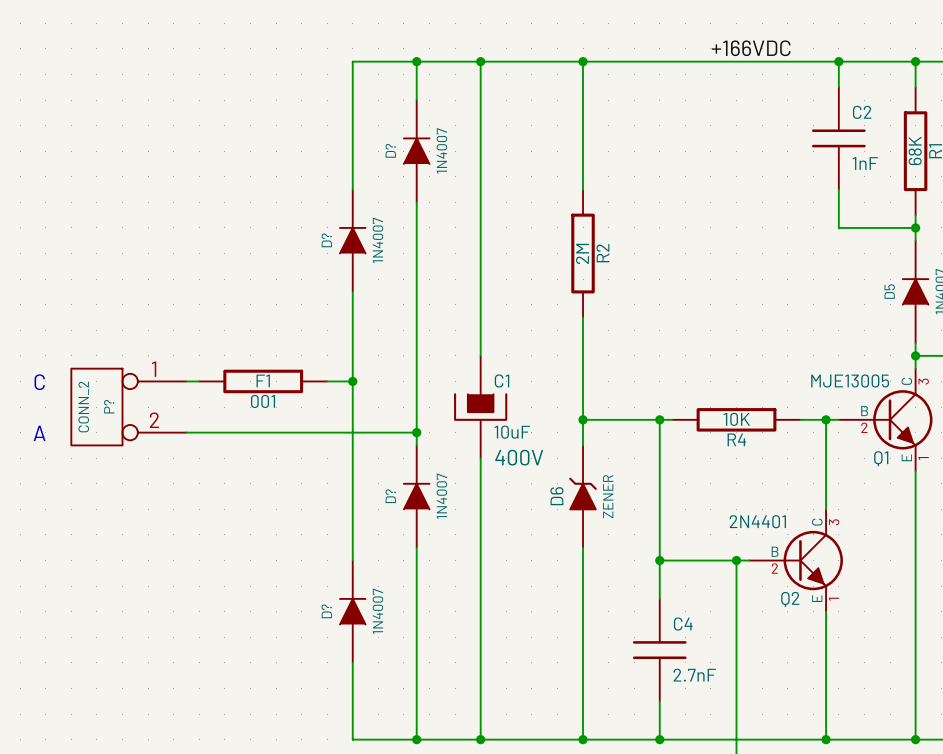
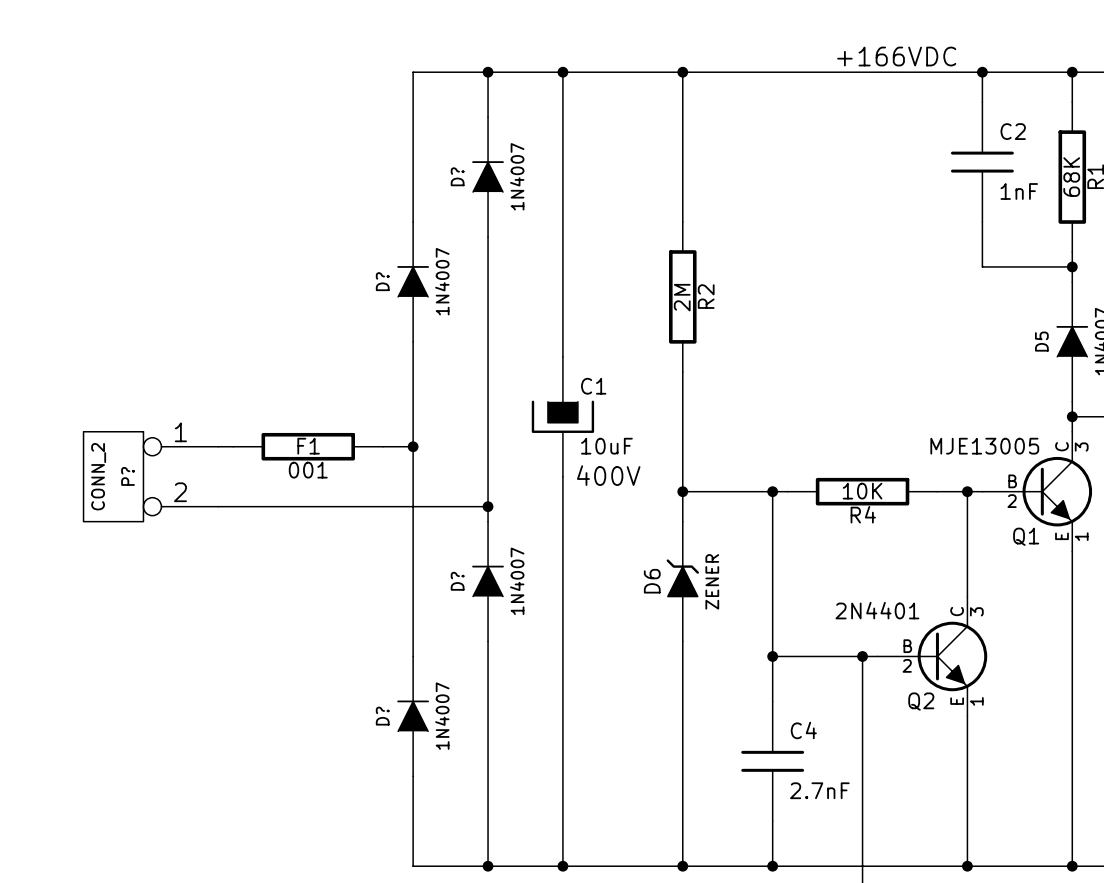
text: C (39, 382) -> none
C1 position: (480, 407) -> (562, 416)
text: A (39, 433) -> none

